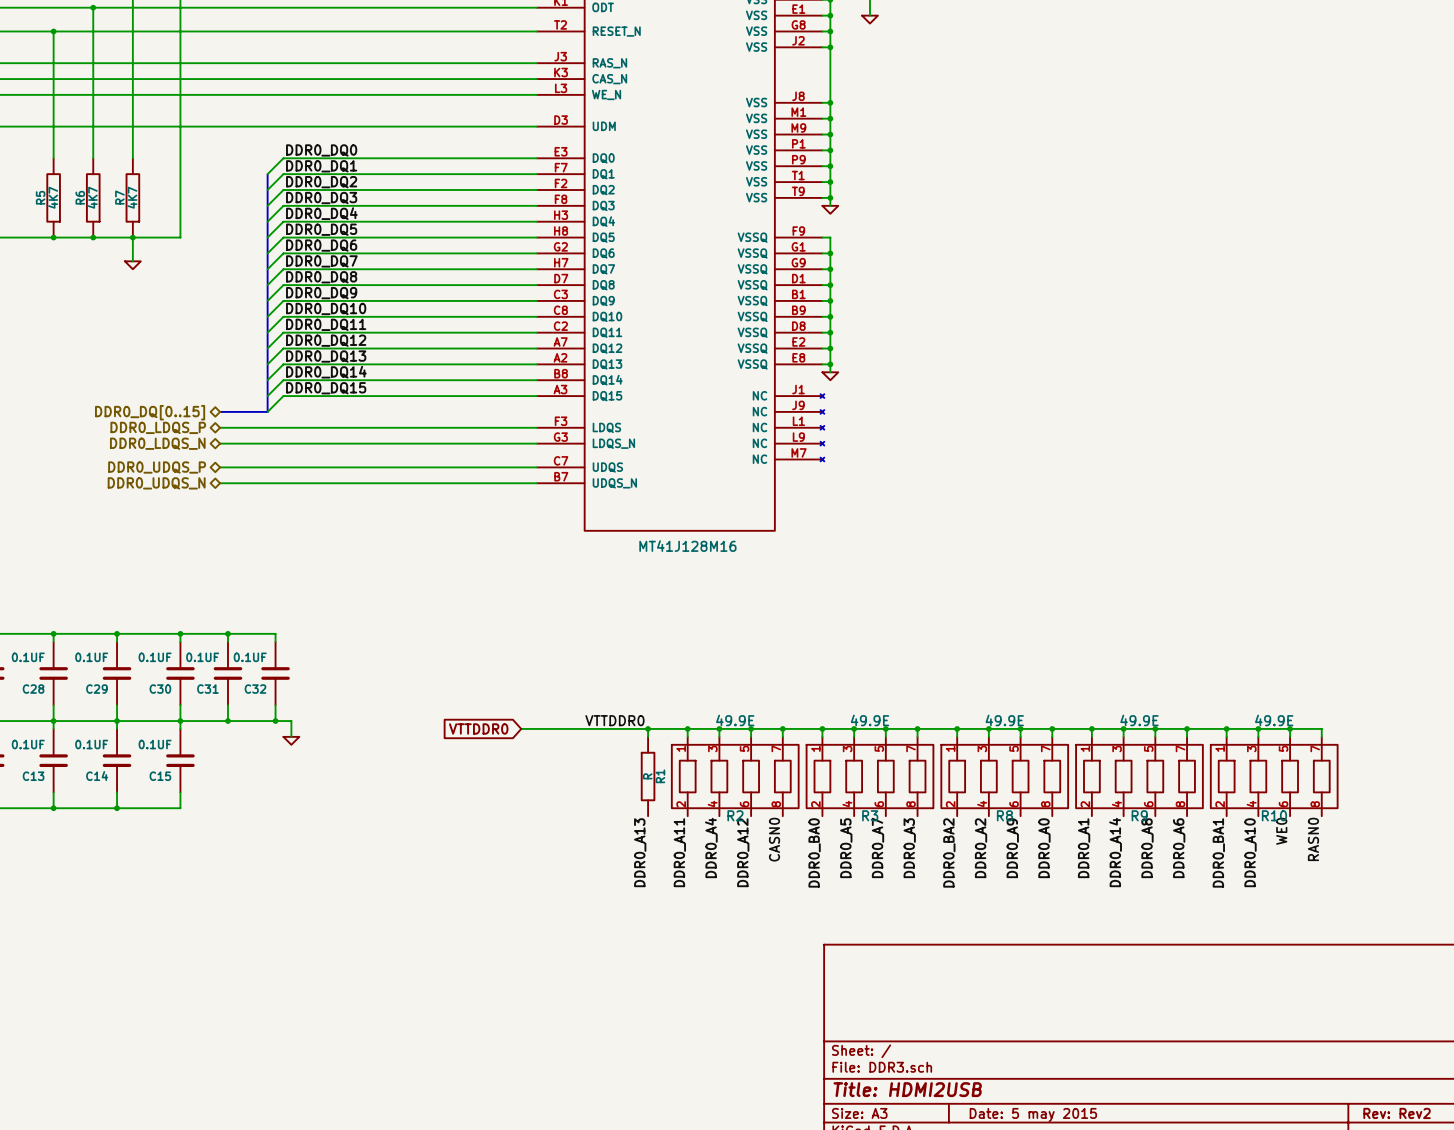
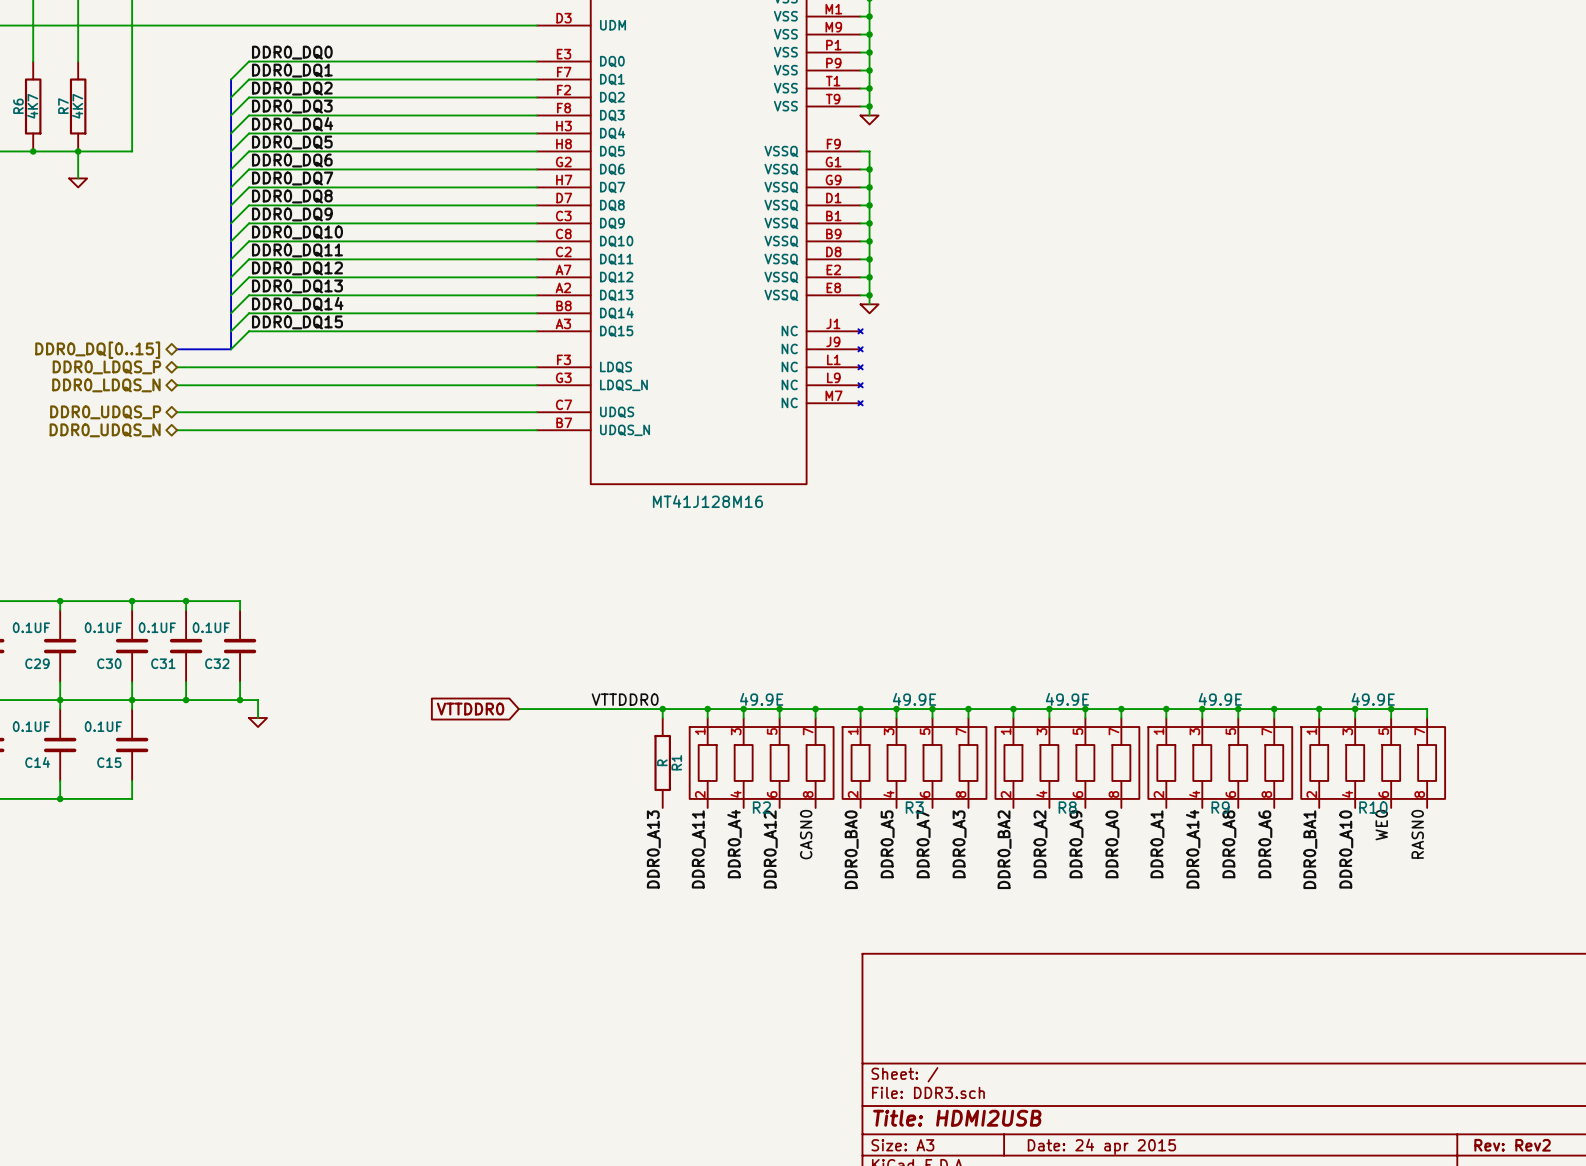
title block: Date: 5 may 2015 (1033, 1115) -> Date: 24 apr 2015 (1101, 1146)

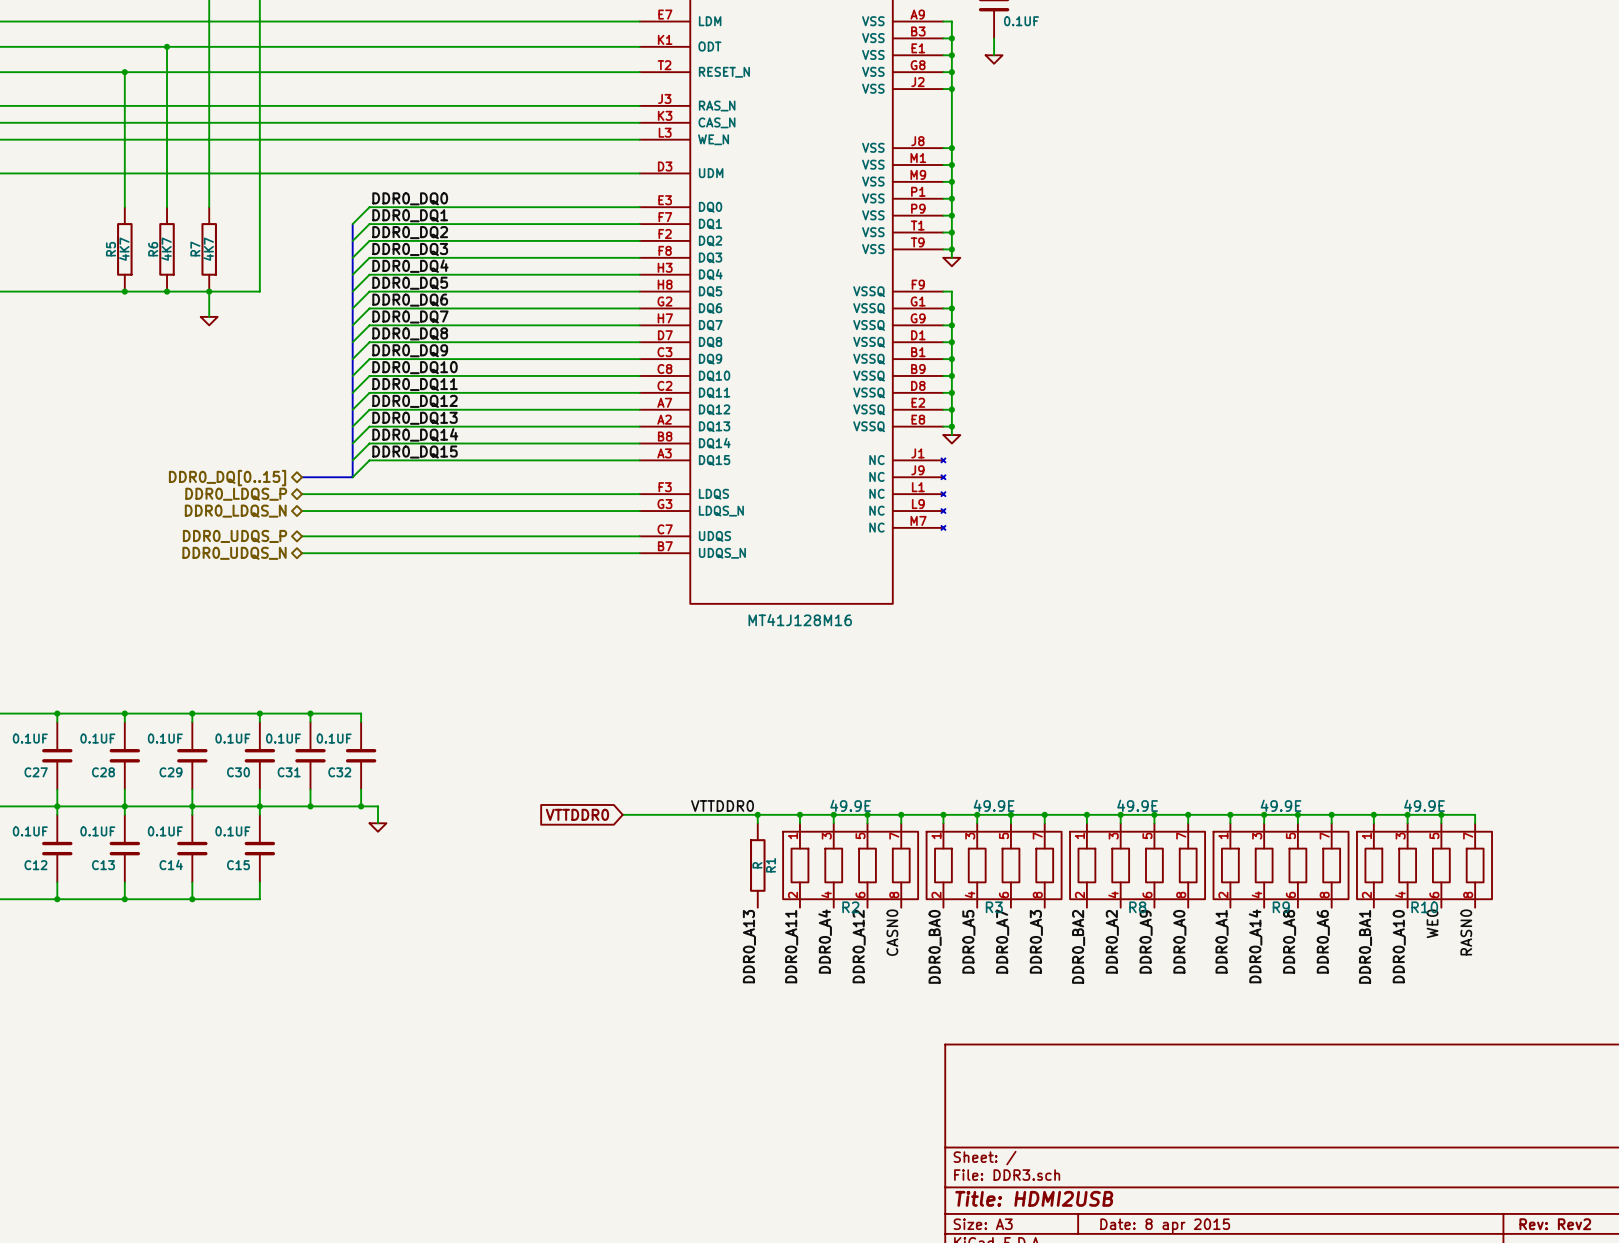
title block: Date: 24 apr 2015 (1101, 1146) -> Date: 8 apr 2015 (1165, 1225)

